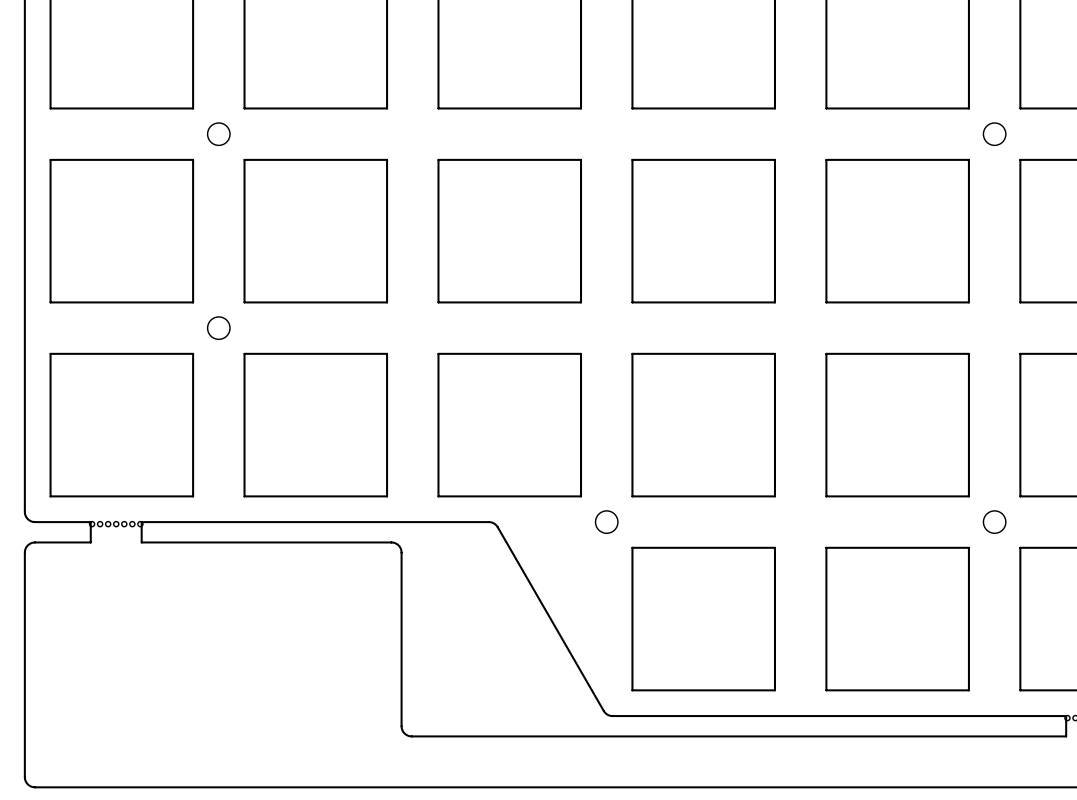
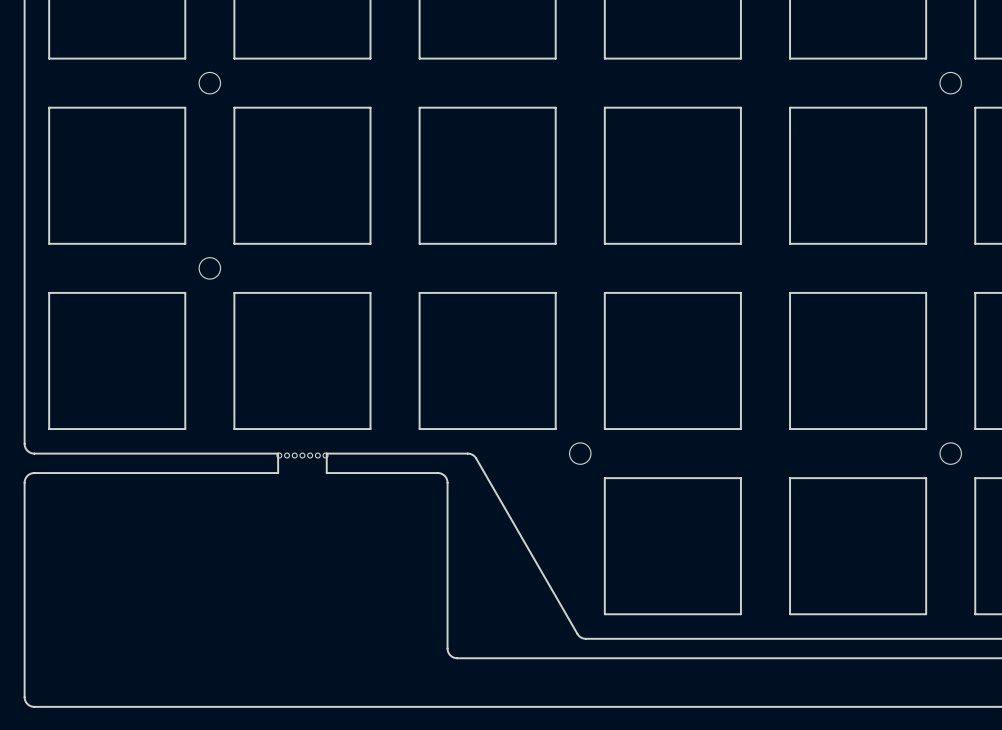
board edge: (90, 522) (90, 542) -> (87, 453) (136, 453)
board edge: (141, 522) (141, 542) -> (87, 473) (136, 473)
board edge: (290, 522) (341, 522) -> (278, 453) (278, 473)
part position: (116, 524) -> (302, 455)
board edge: (290, 542) (341, 542) -> (326, 453) (326, 473)
board edge: (391, 542) (398, 545) (401, 551) (402, 730) (410, 736) (477, 736) -> (374, 473) (438, 473) (446, 478) (447, 649) (451, 656) (457, 658)

